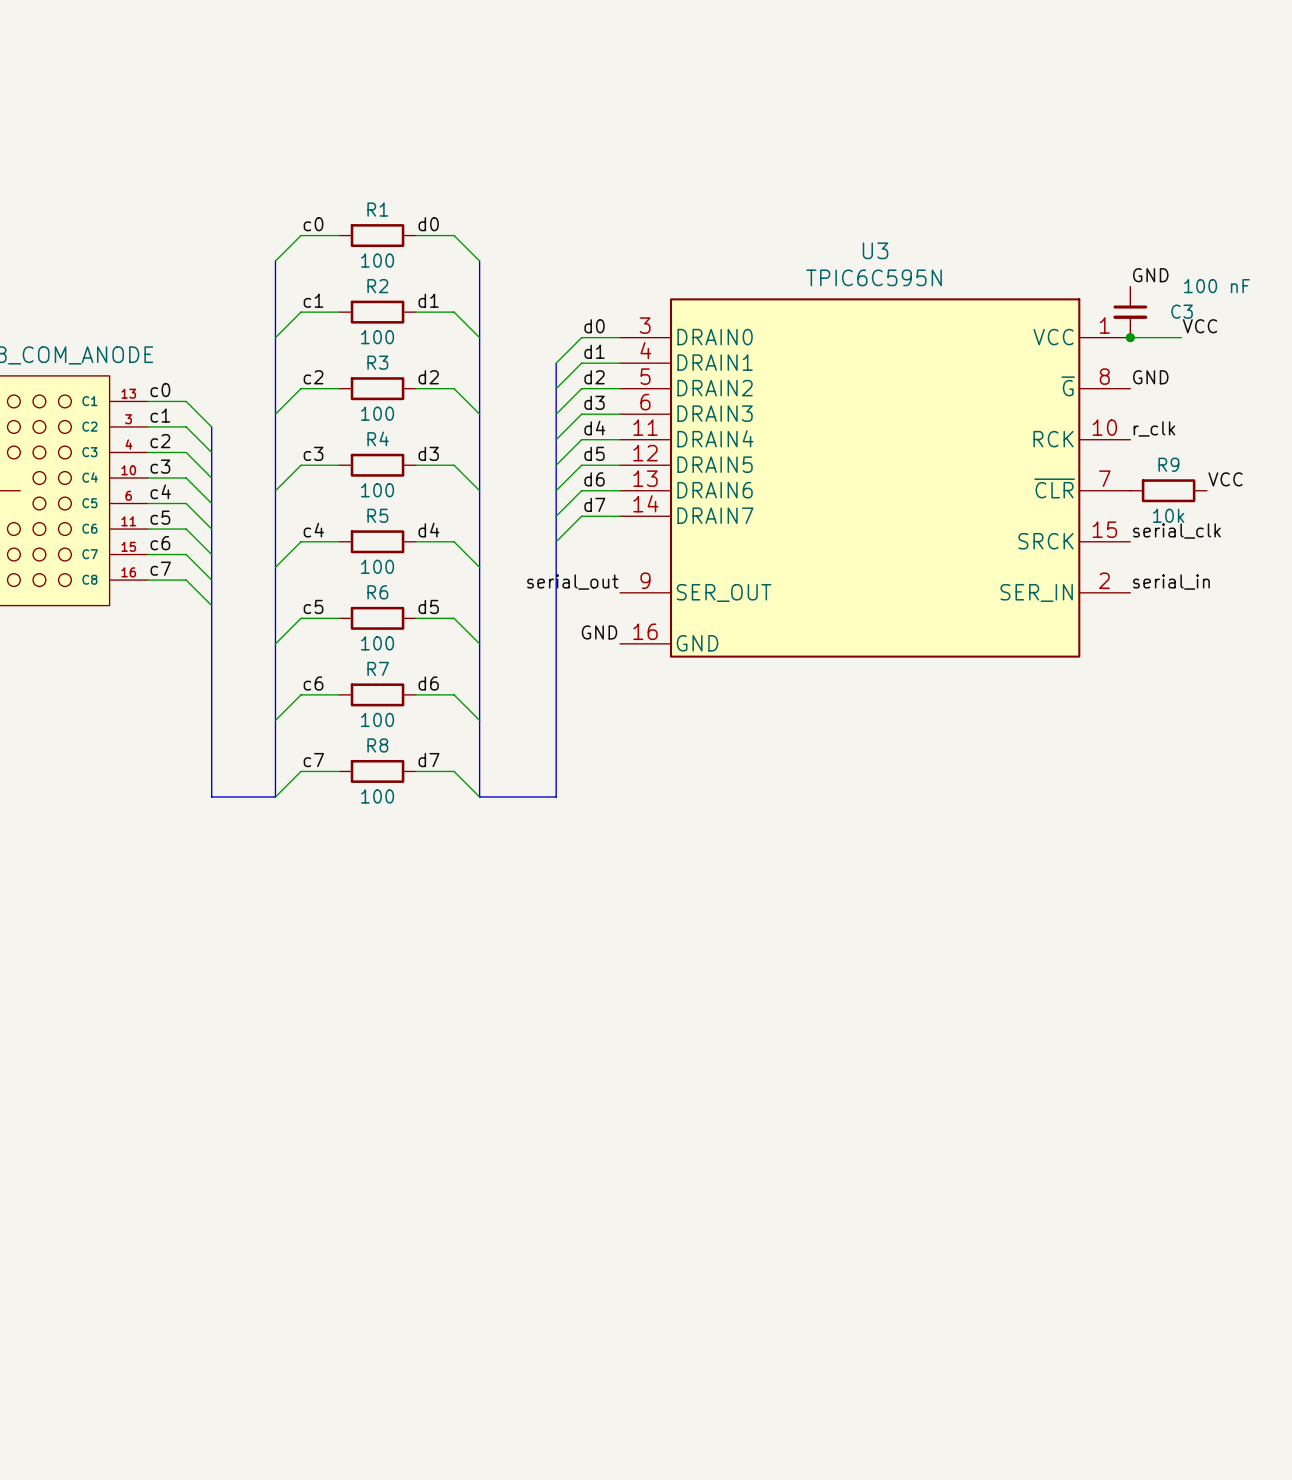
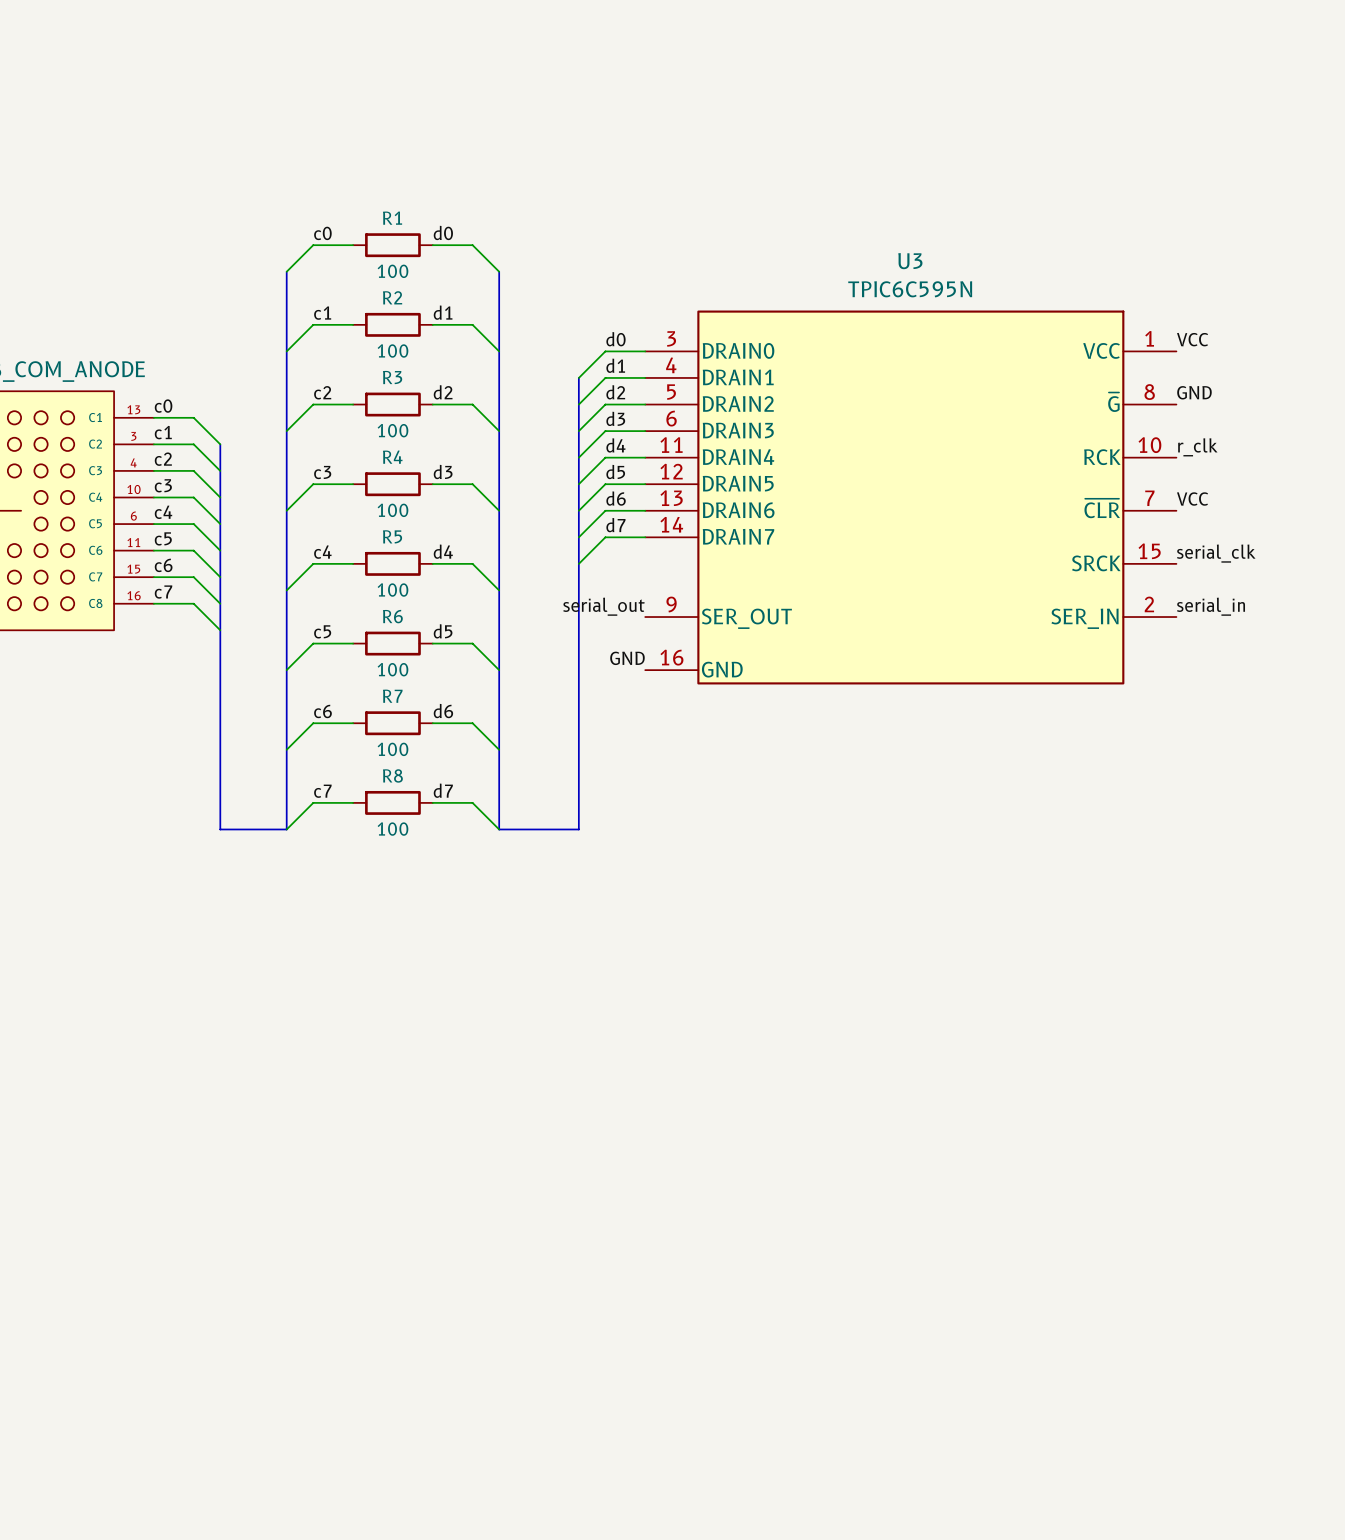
label: GND (1150, 275) -> none
C3: 100 nF (1130, 312) -> none
label position: VCC (1199, 326) -> VCC (1192, 339)
wire: (1130, 337) (1181, 337) -> none
junction: (1130, 337) -> none
label position: VCC (1225, 479) -> VCC (1192, 499)
R9: 10k (1168, 490) -> none

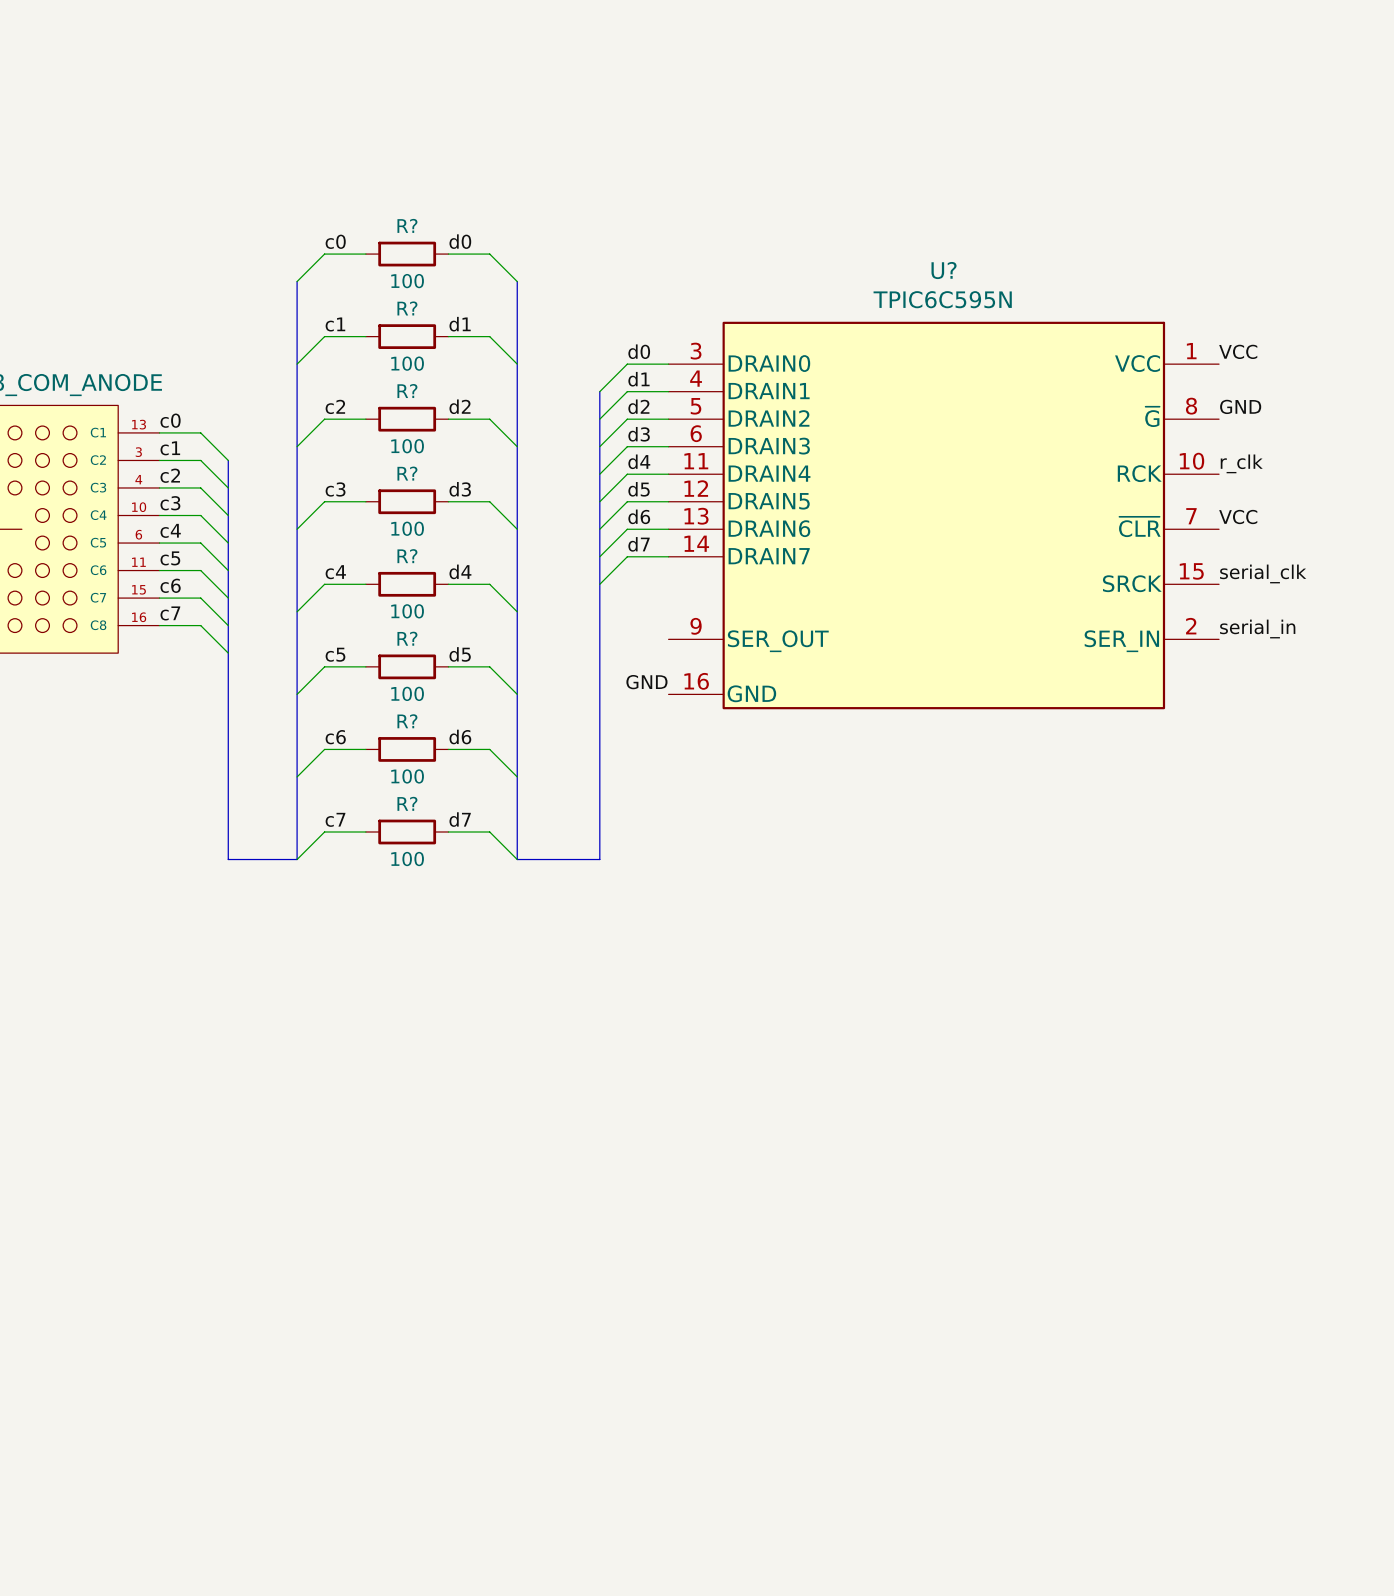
R1 name: R1 (392, 218) -> R? (407, 225)
U3 name: U3 (910, 261) -> U? (944, 270)
R2 name: R2 (392, 297) -> R? (407, 308)
R3 name: R3 (392, 377) -> R? (407, 391)
R4 name: R4 (392, 457) -> R? (407, 473)
R5 name: R5 (392, 536) -> R? (407, 556)
label: serial_out (603, 606) -> none
R6 name: R6 (392, 616) -> R? (407, 638)
R7 name: R7 (392, 696) -> R? (407, 721)
R8 name: R8 (392, 775) -> R? (407, 803)

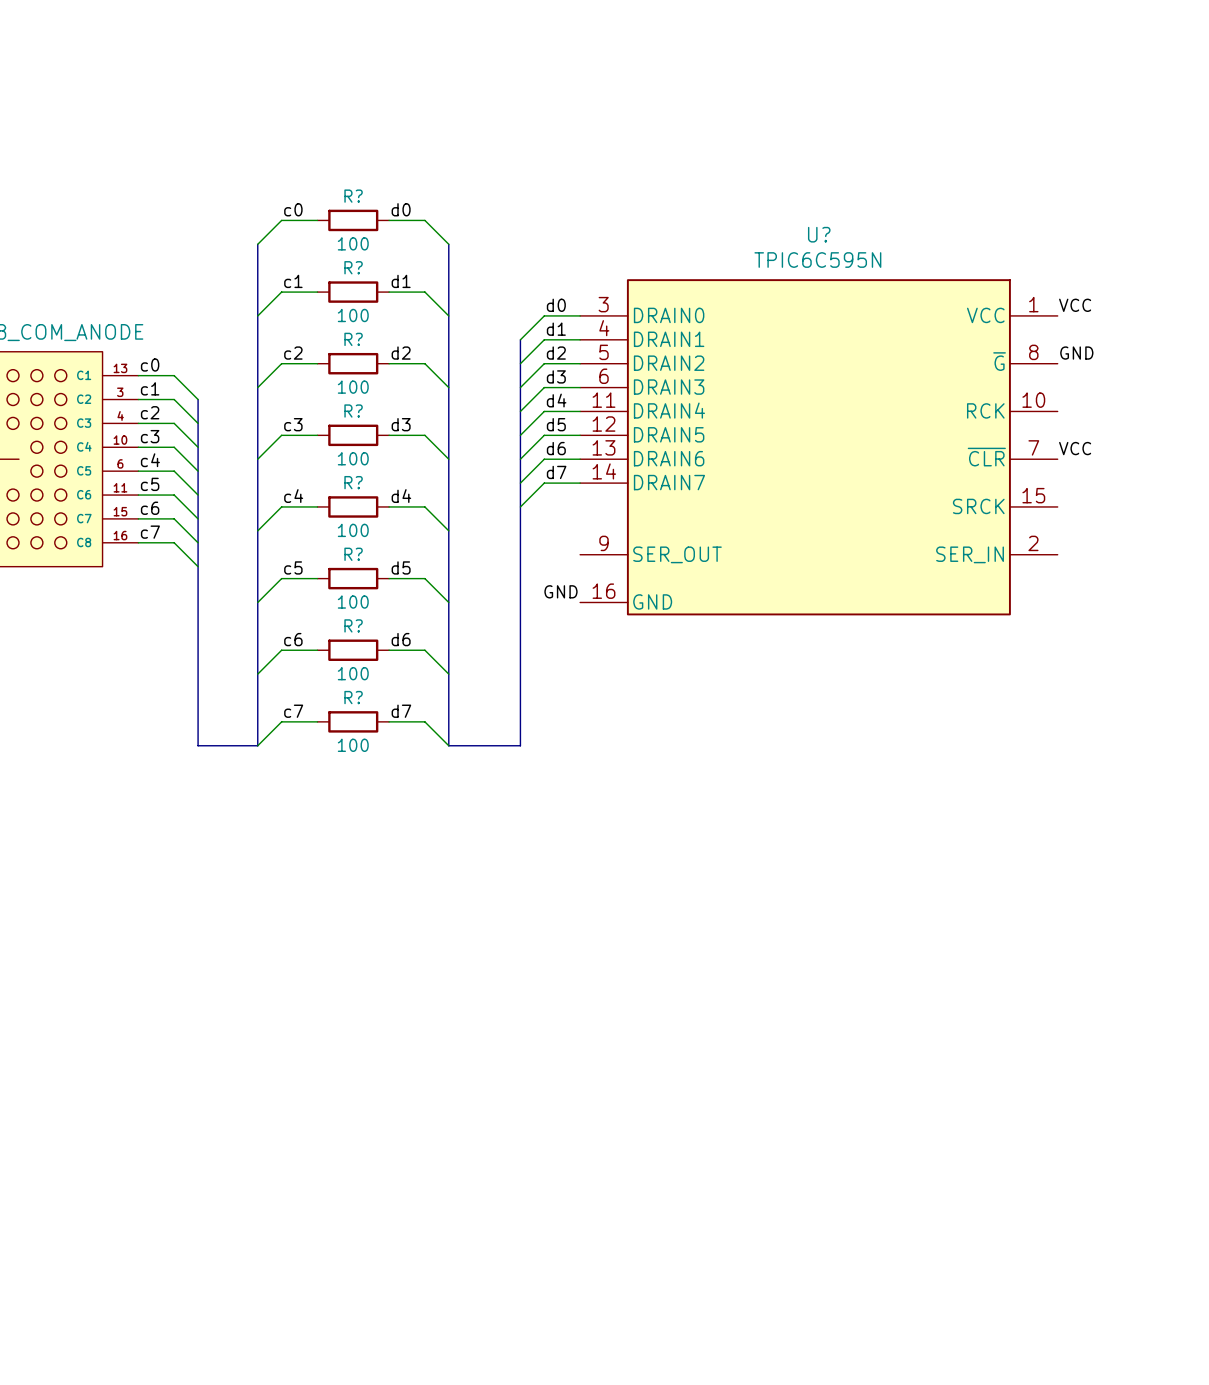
label: r_clk (1241, 463) -> none
label: serial_clk (1263, 573) -> none
label: serial_in (1257, 629) -> none

